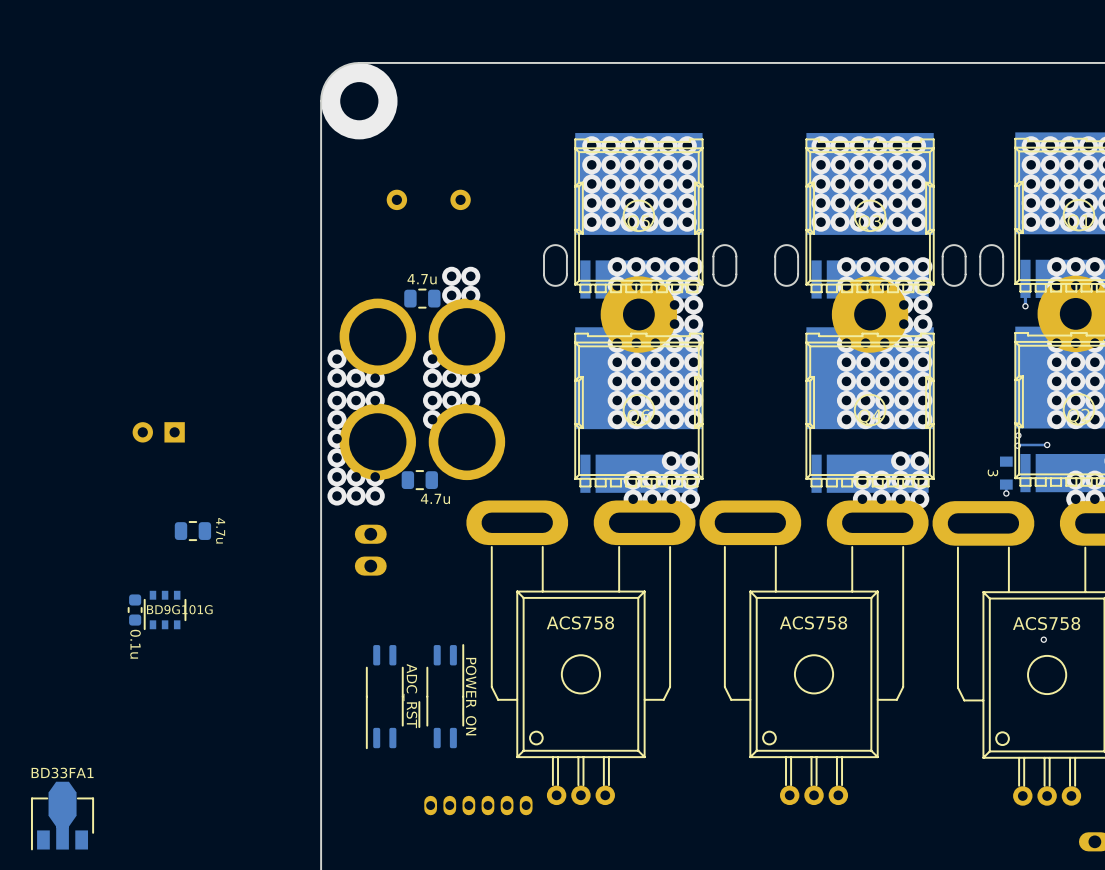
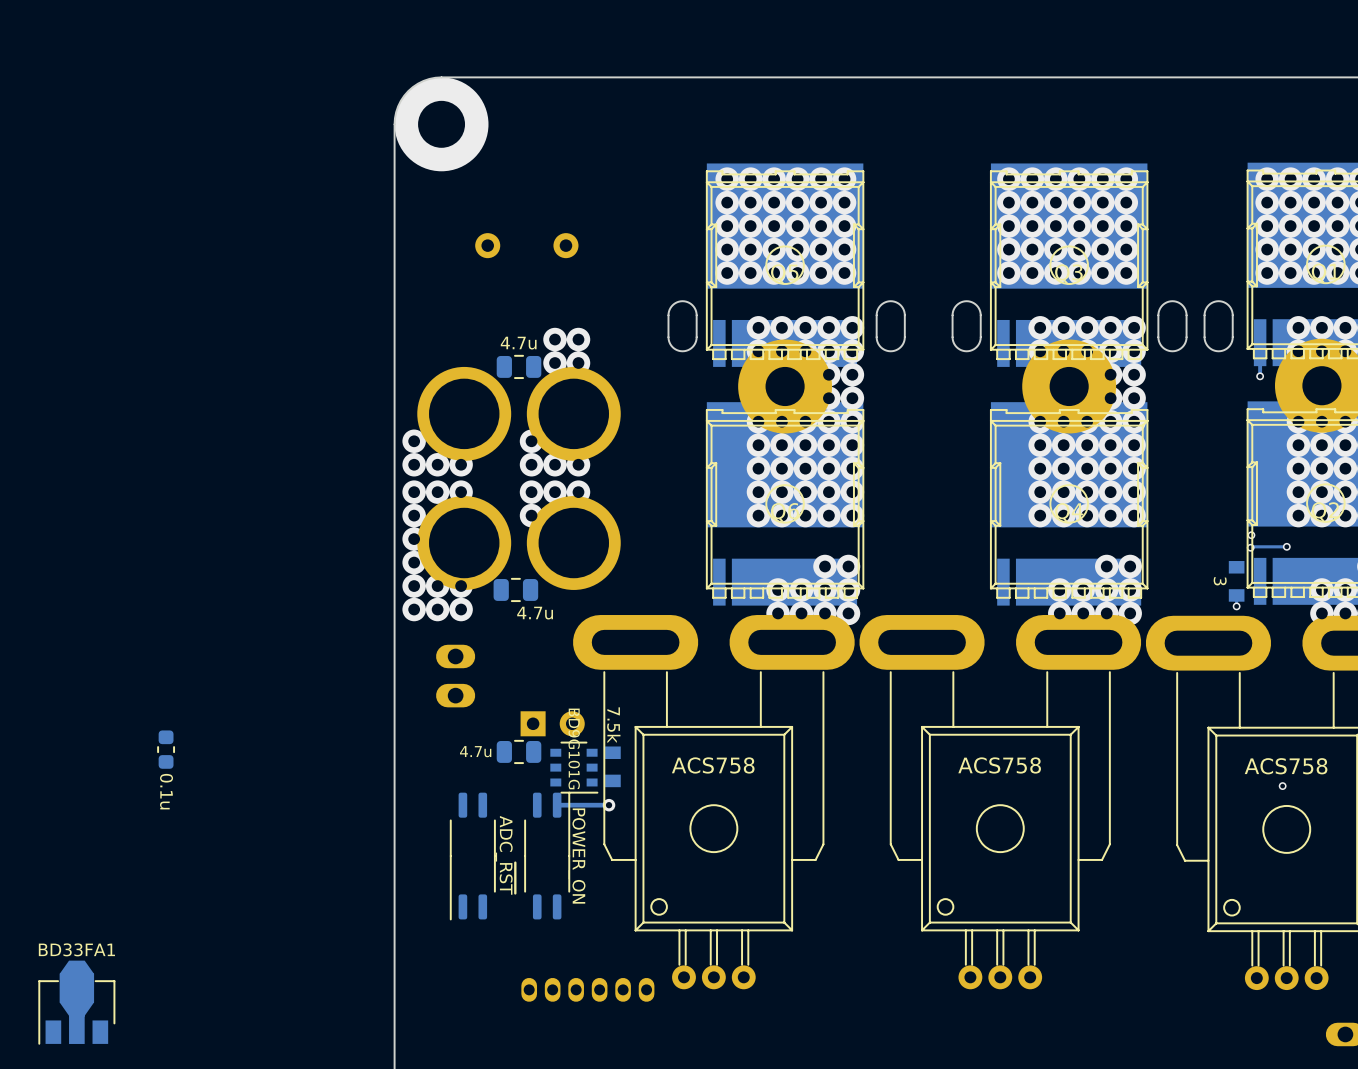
part: (158, 432) -> none
part value rotation: 0° (220, 530) -> 90° counterclockwise (475, 751)
part value position: 4.7u (220, 530) -> 4.7u (475, 751)
part position: (192, 531) -> (519, 751)
part: none -> (552, 723)
part rotation: 0° (165, 610) -> 90° counterclockwise (574, 767)
part position: (165, 610) -> (574, 767)
part: none -> 7.5k (612, 766)
track: none -> (609, 805) (557, 805)
via: none -> (609, 805)

